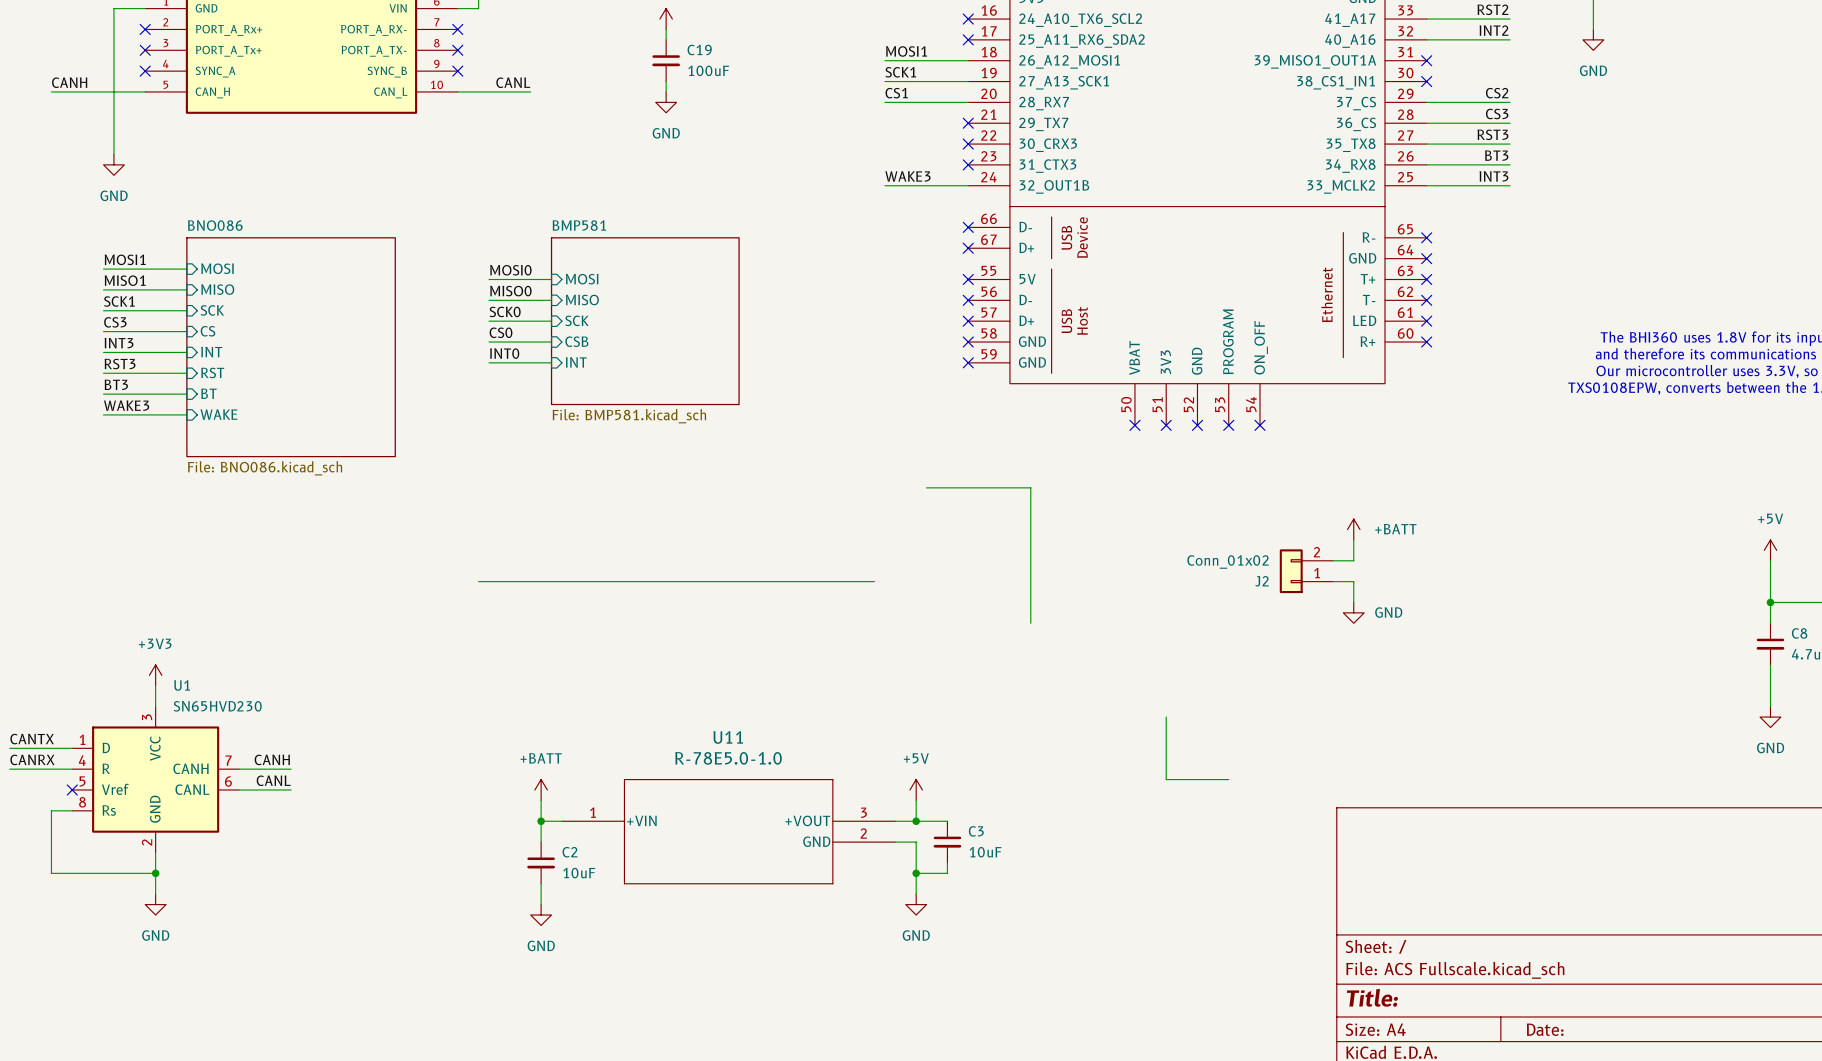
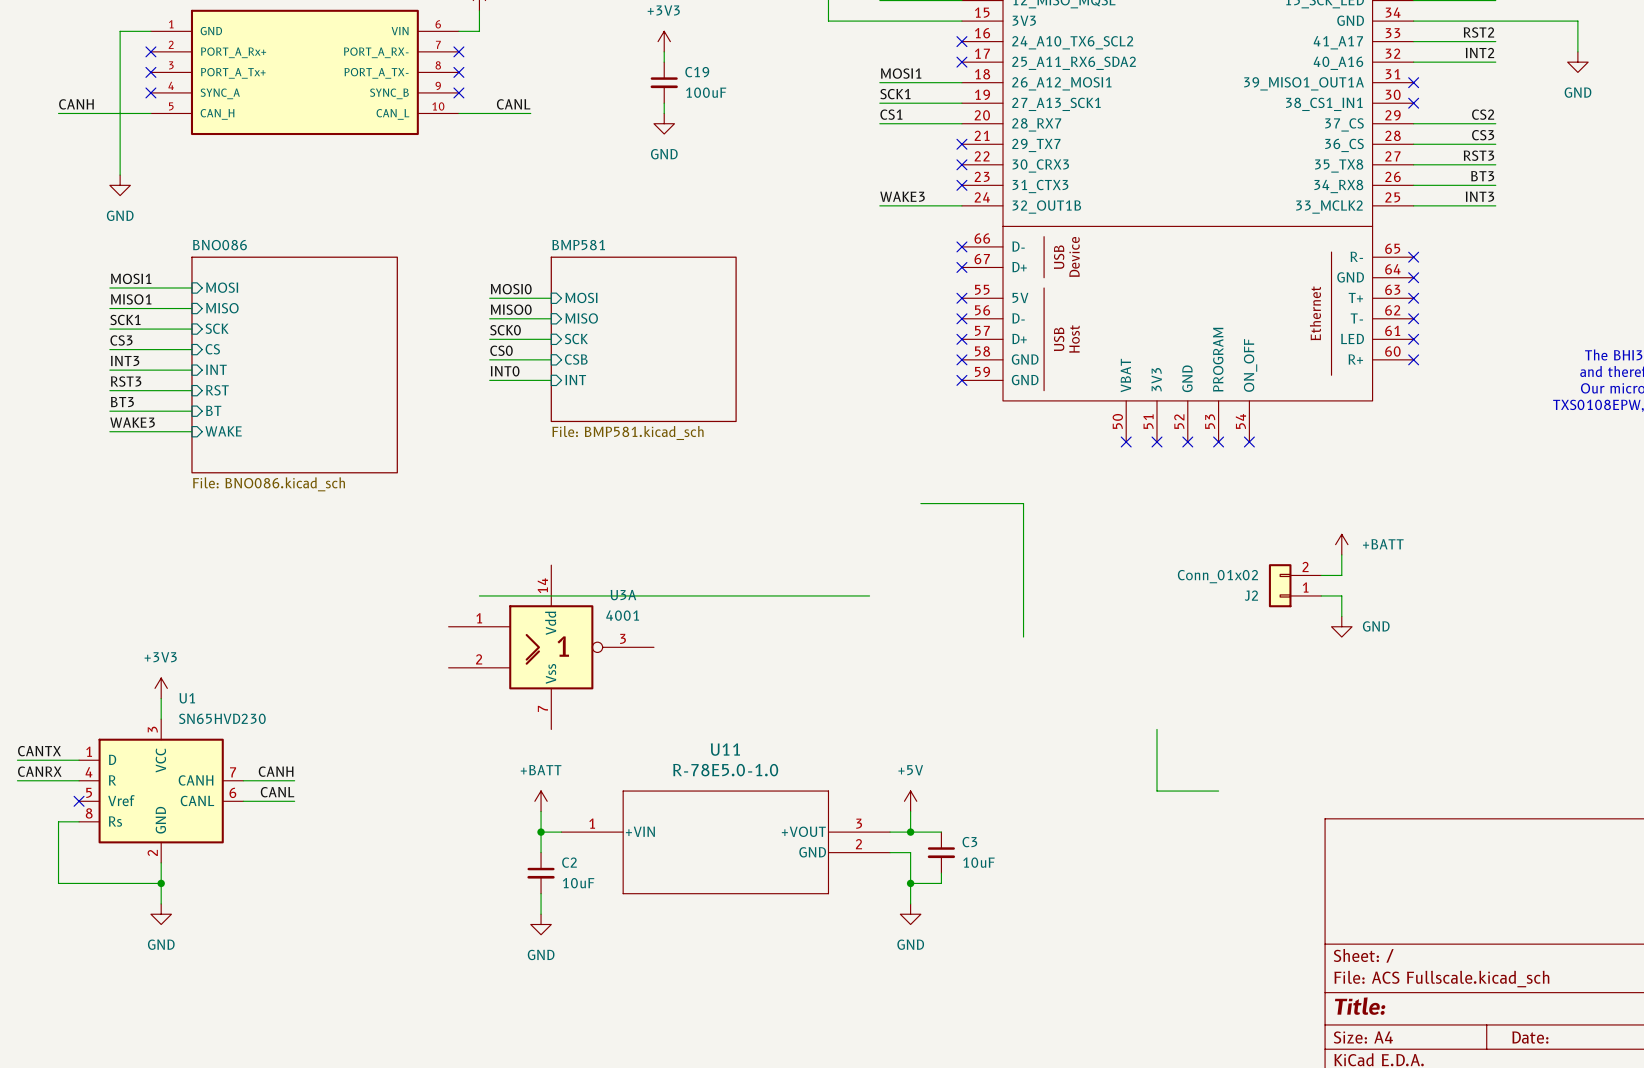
U3A: none -> 4001 (551, 647)

